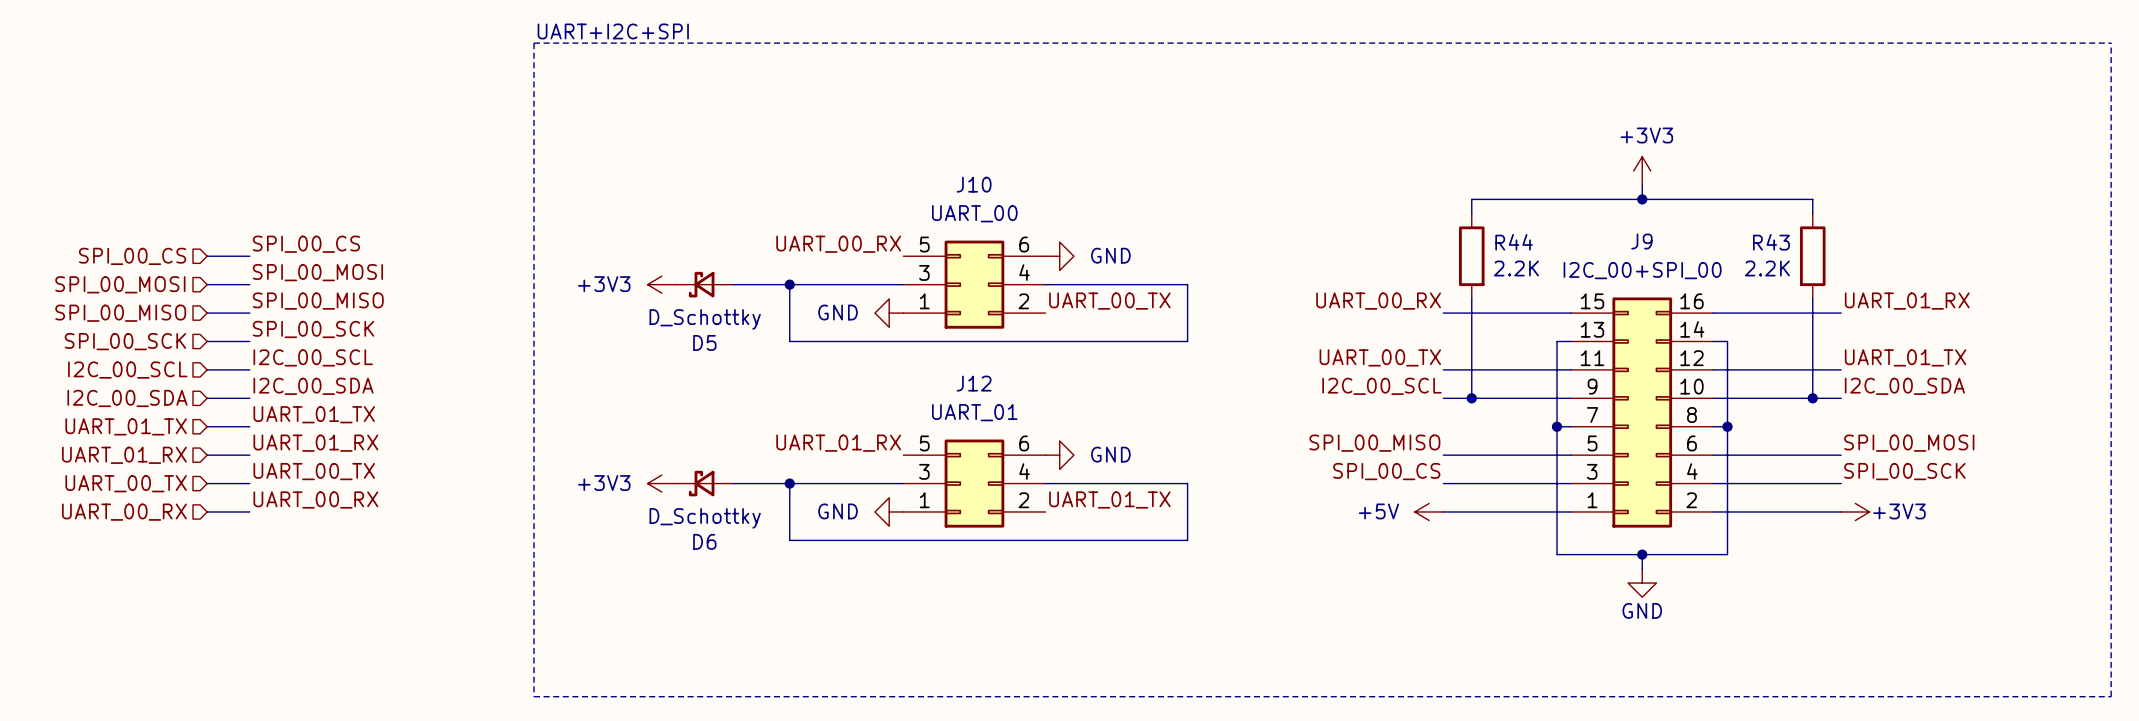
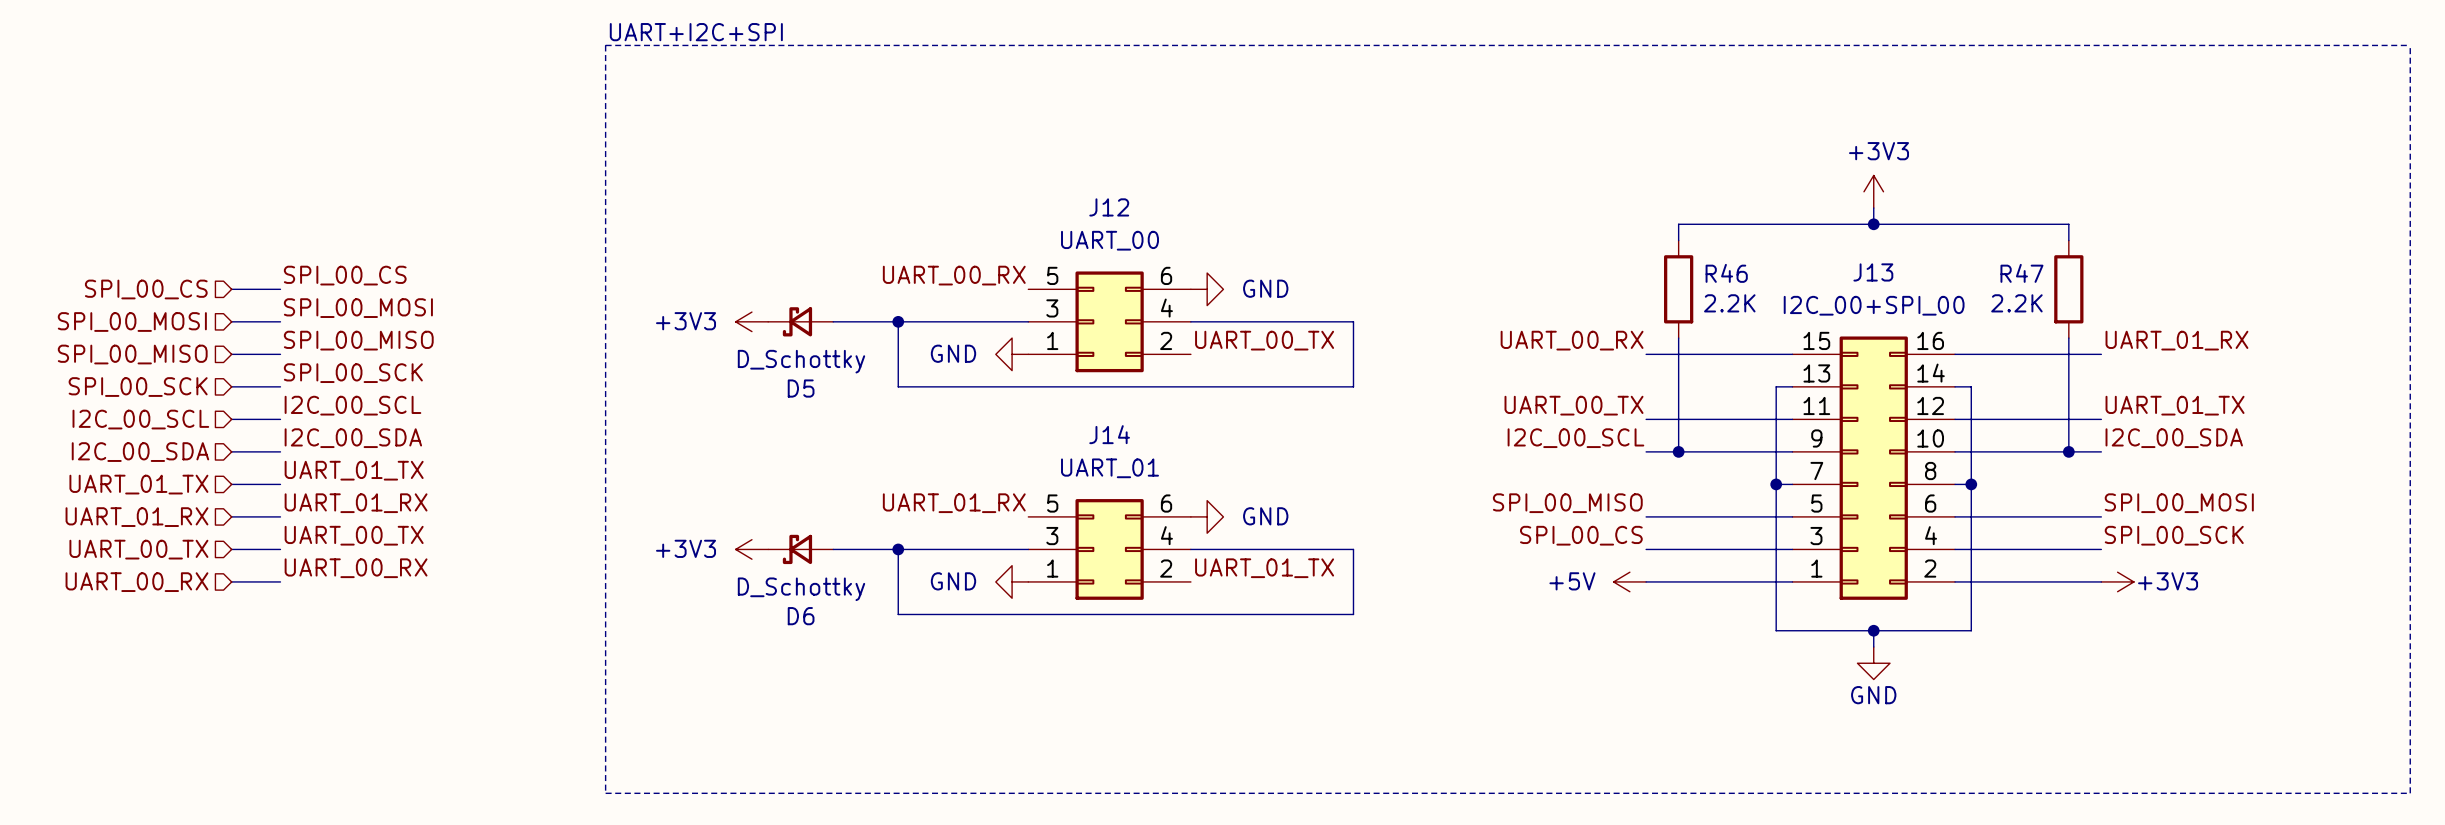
J10 name: J10 (974, 184) -> J12 (1109, 207)
J9 name: J9 (1641, 241) -> J13 (1873, 272)
R44 name: R44 (1514, 242) -> R46 (1726, 273)
R43 name: R43 (1771, 242) -> R47 (2021, 273)
J12 name: J12 (974, 383) -> J14 (1109, 434)

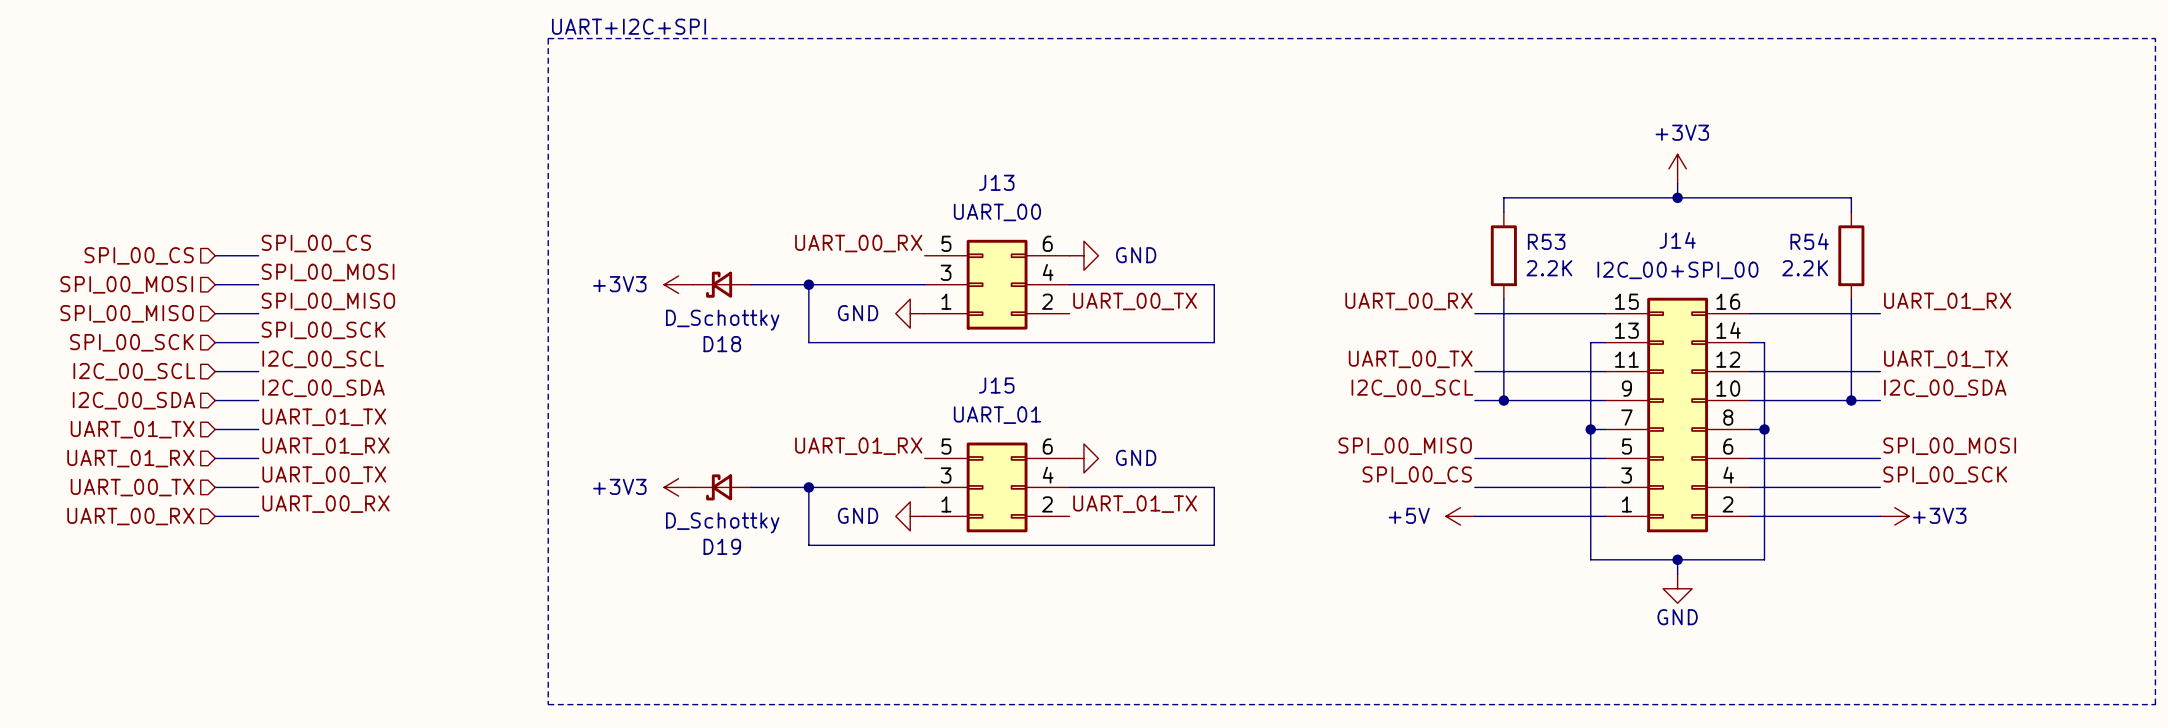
J12 name: J12 (1109, 207) -> J13 (996, 182)
J13 name: J13 (1873, 272) -> J14 (1677, 240)
R46 name: R46 (1726, 273) -> R53 (1546, 241)
R47 name: R47 (2021, 273) -> R54 (1809, 241)
D5 name: D5 (801, 388) -> D18 (722, 344)
J14 name: J14 (1109, 434) -> J15 (996, 385)
D6 name: D6 (801, 616) -> D19 (722, 546)

